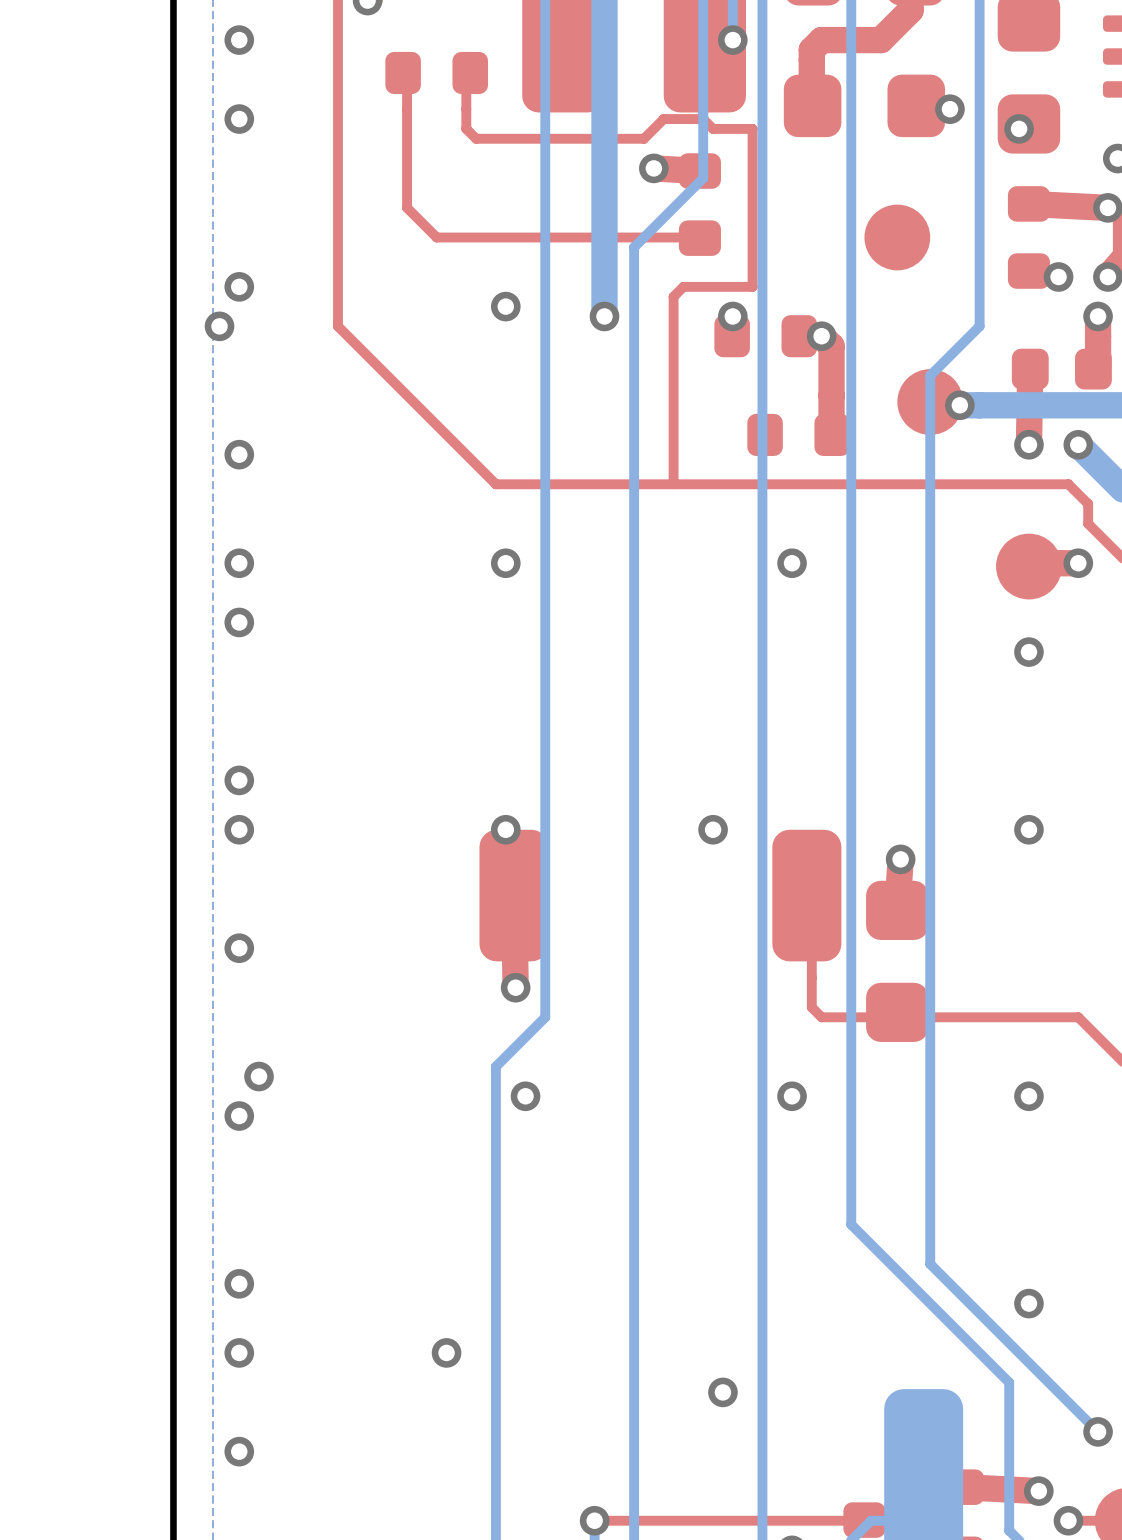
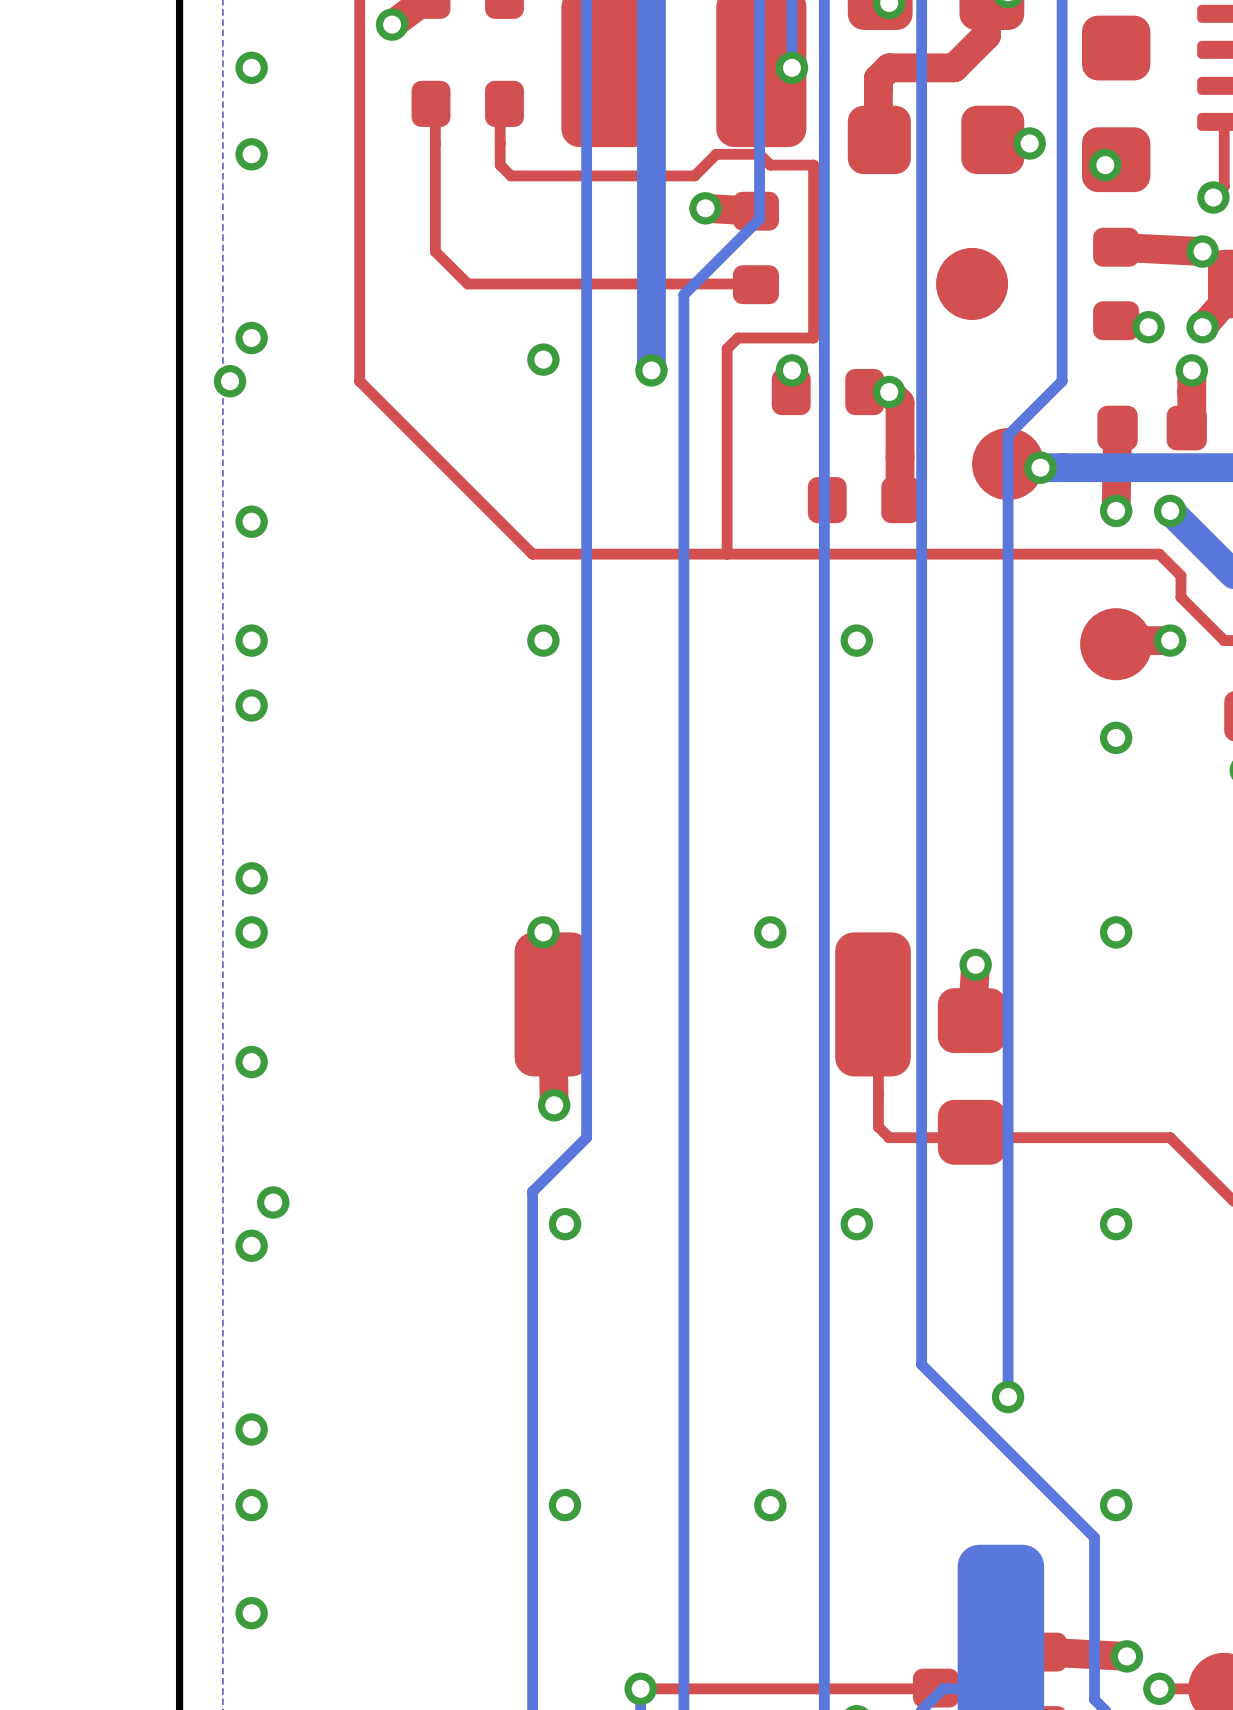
bottom track: (930, 1254) (930, 1264) (1098, 1431) -> none
via: none -> (1008, 1397)
via position: (1028, 1303) -> (1116, 1505)
via position: (446, 1352) -> (565, 1505)
via position: (722, 1392) -> (770, 1505)
via: (1098, 1431) -> none

